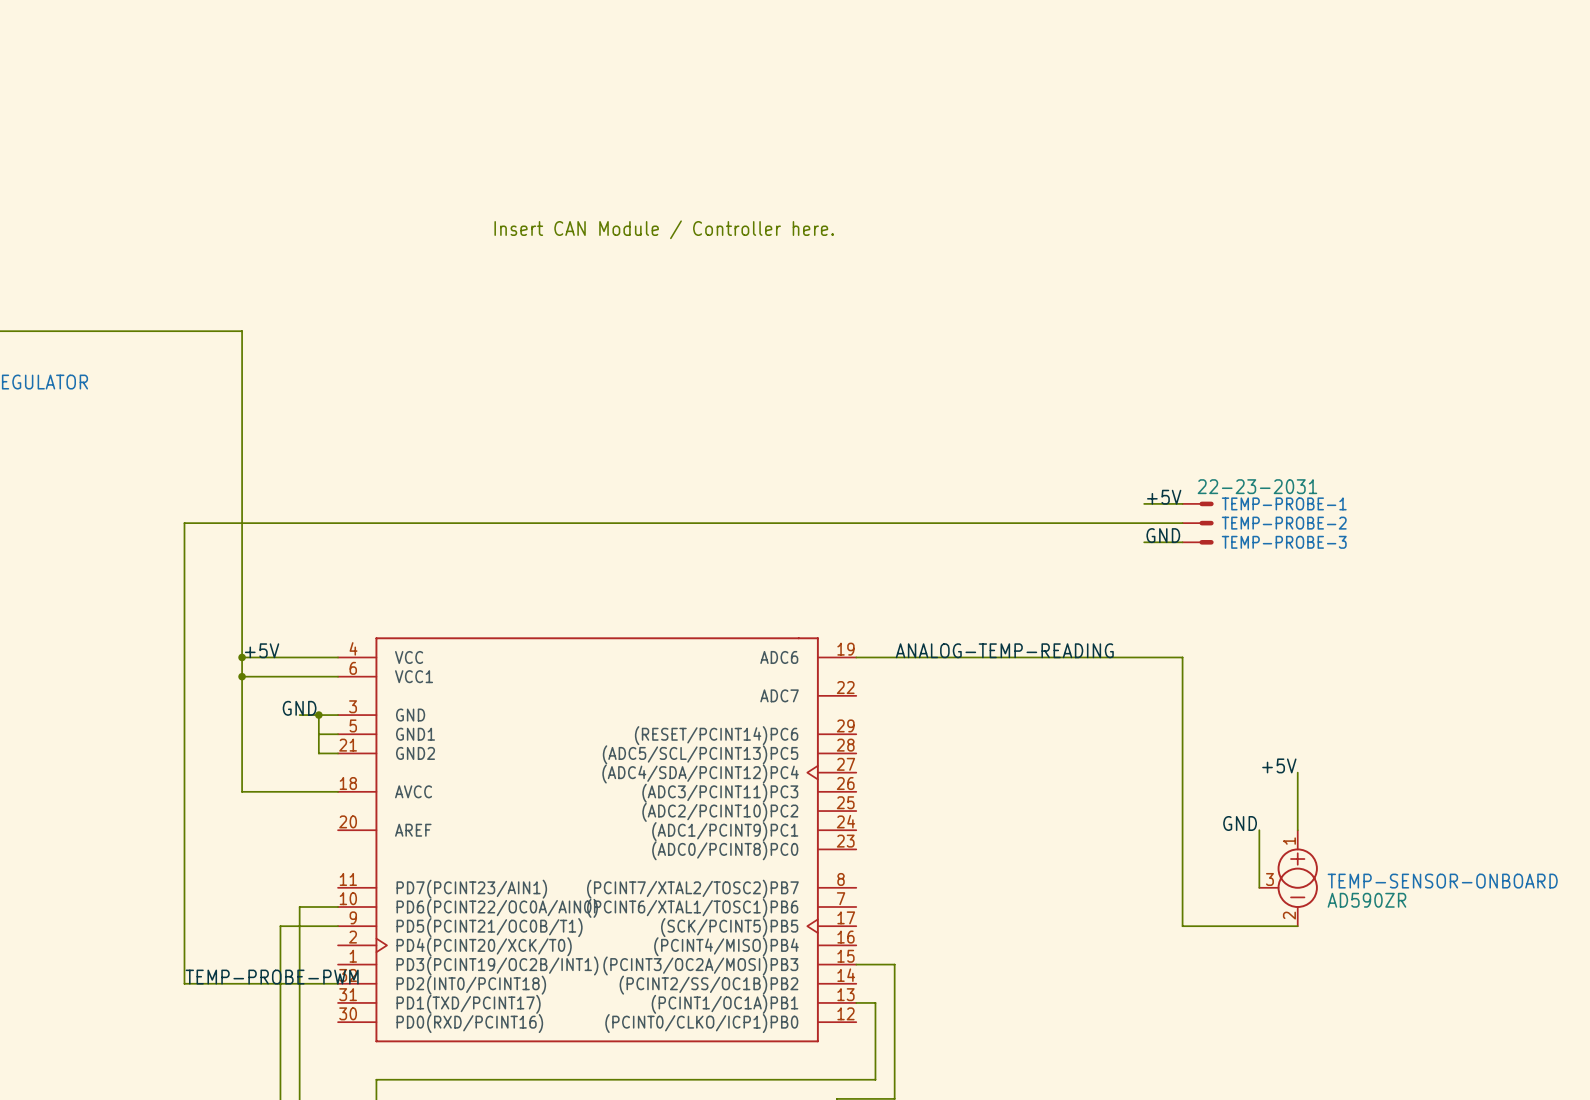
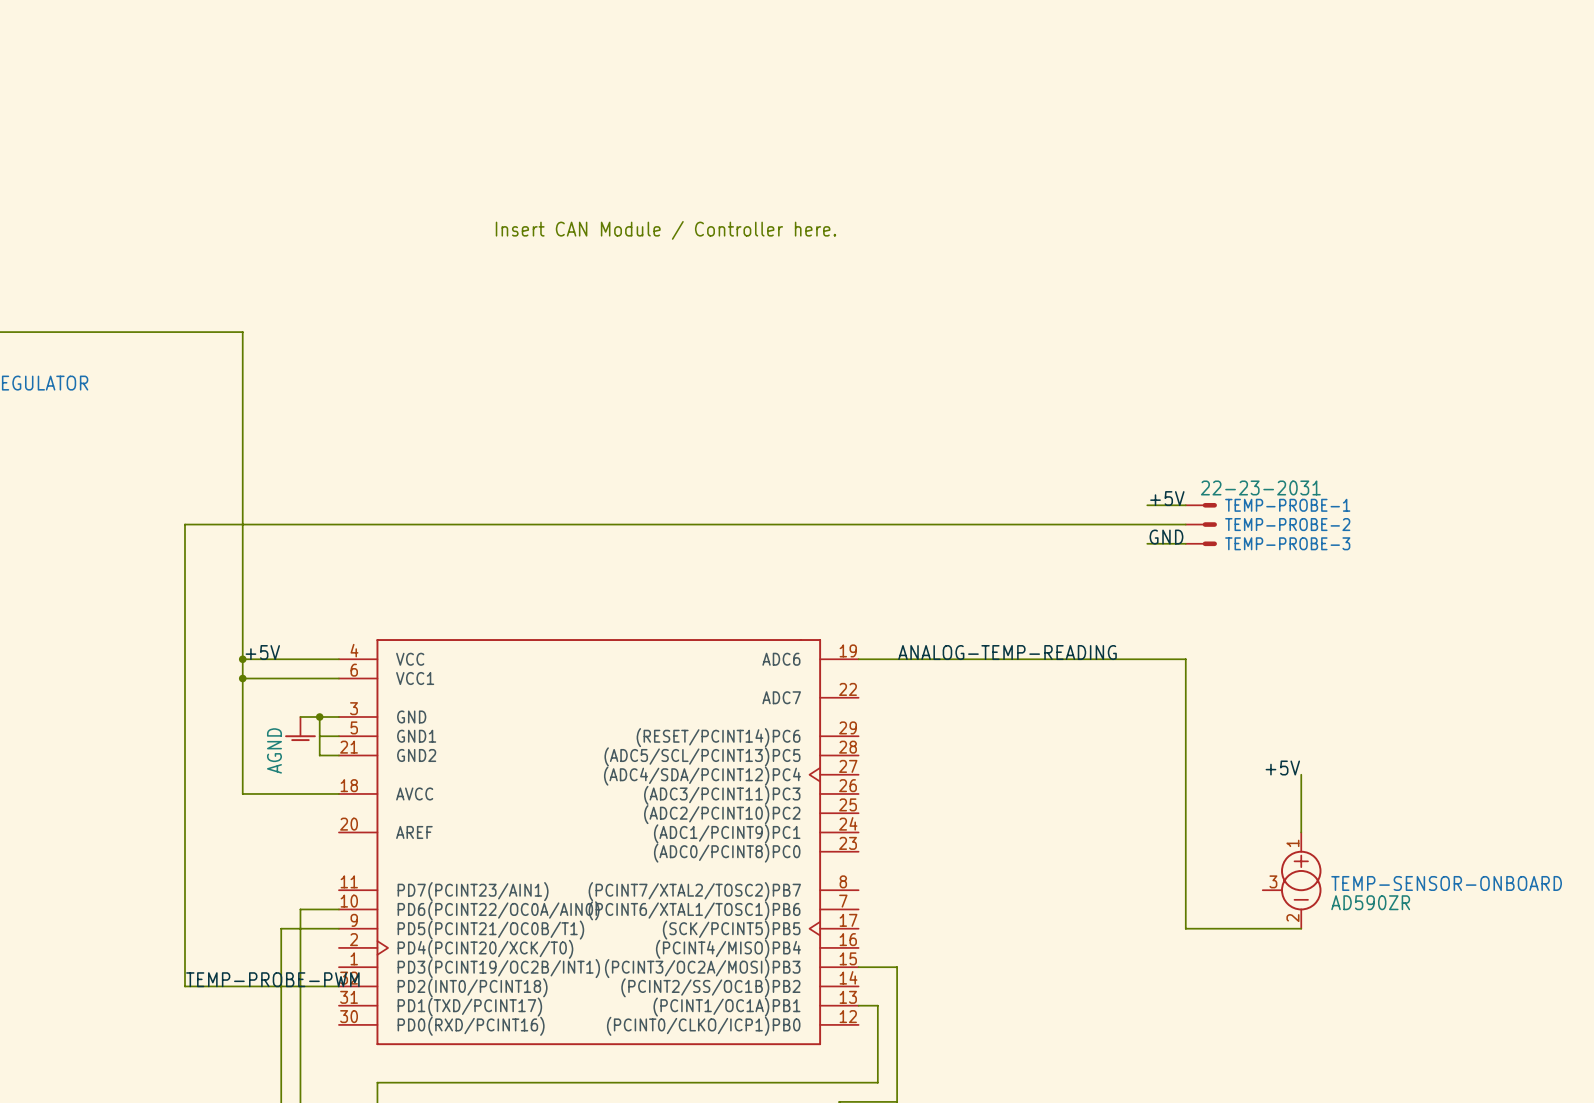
label: GND (299, 708) -> none
power symbol: none -> AGND (300, 729)
label: GND (1240, 823) -> none
wire: (1259, 830) (1259, 887) -> none

